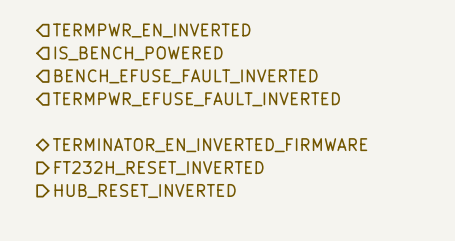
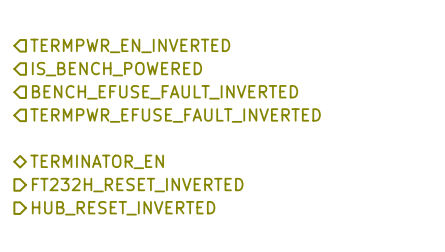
hierarchical label: TERMINATOR_EN_INVERTED_FIRMWARE (210, 145) -> TERMINATOR_EN (97, 161)

